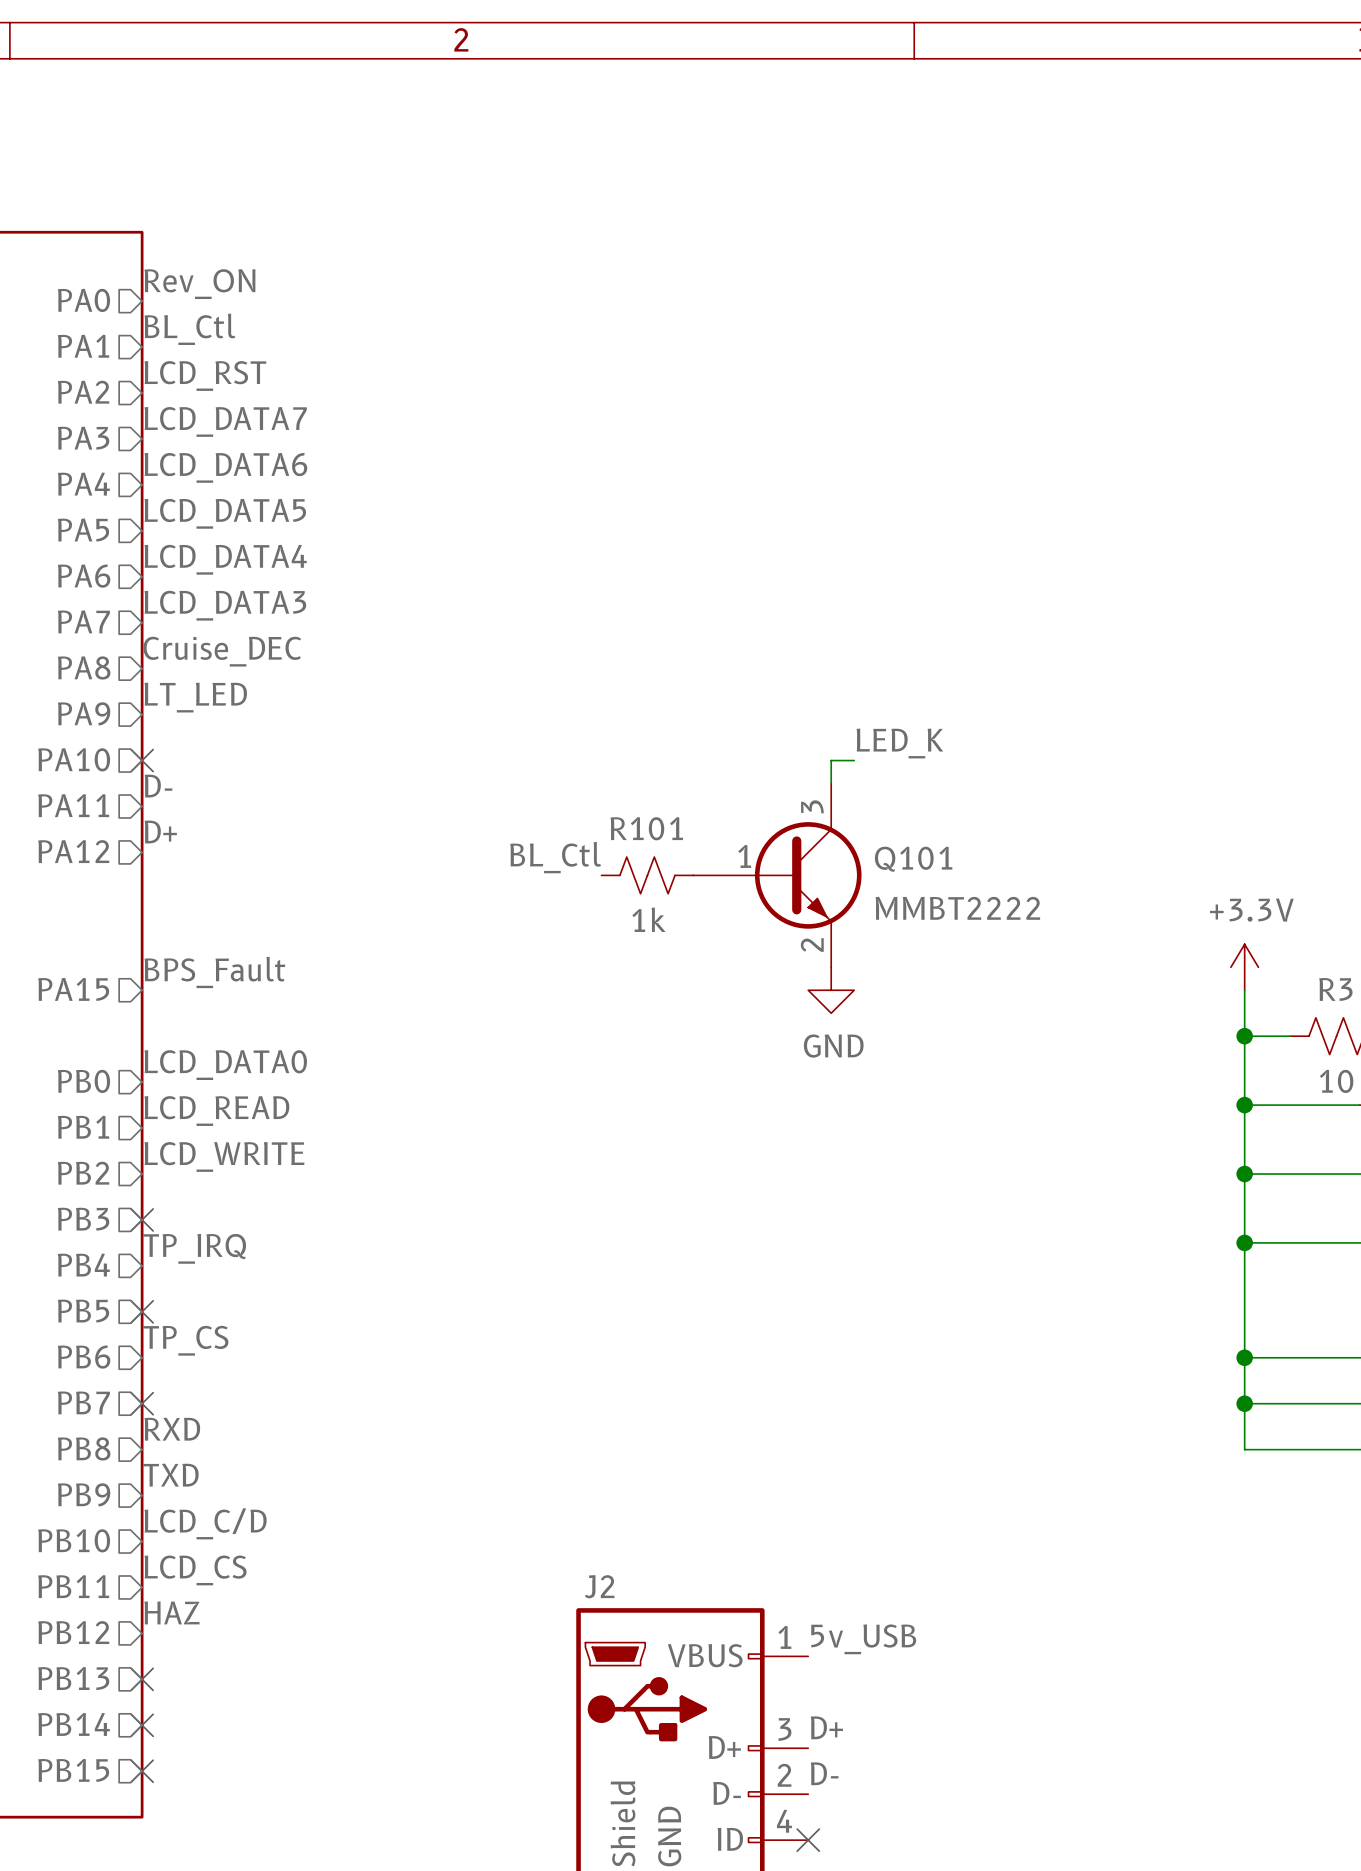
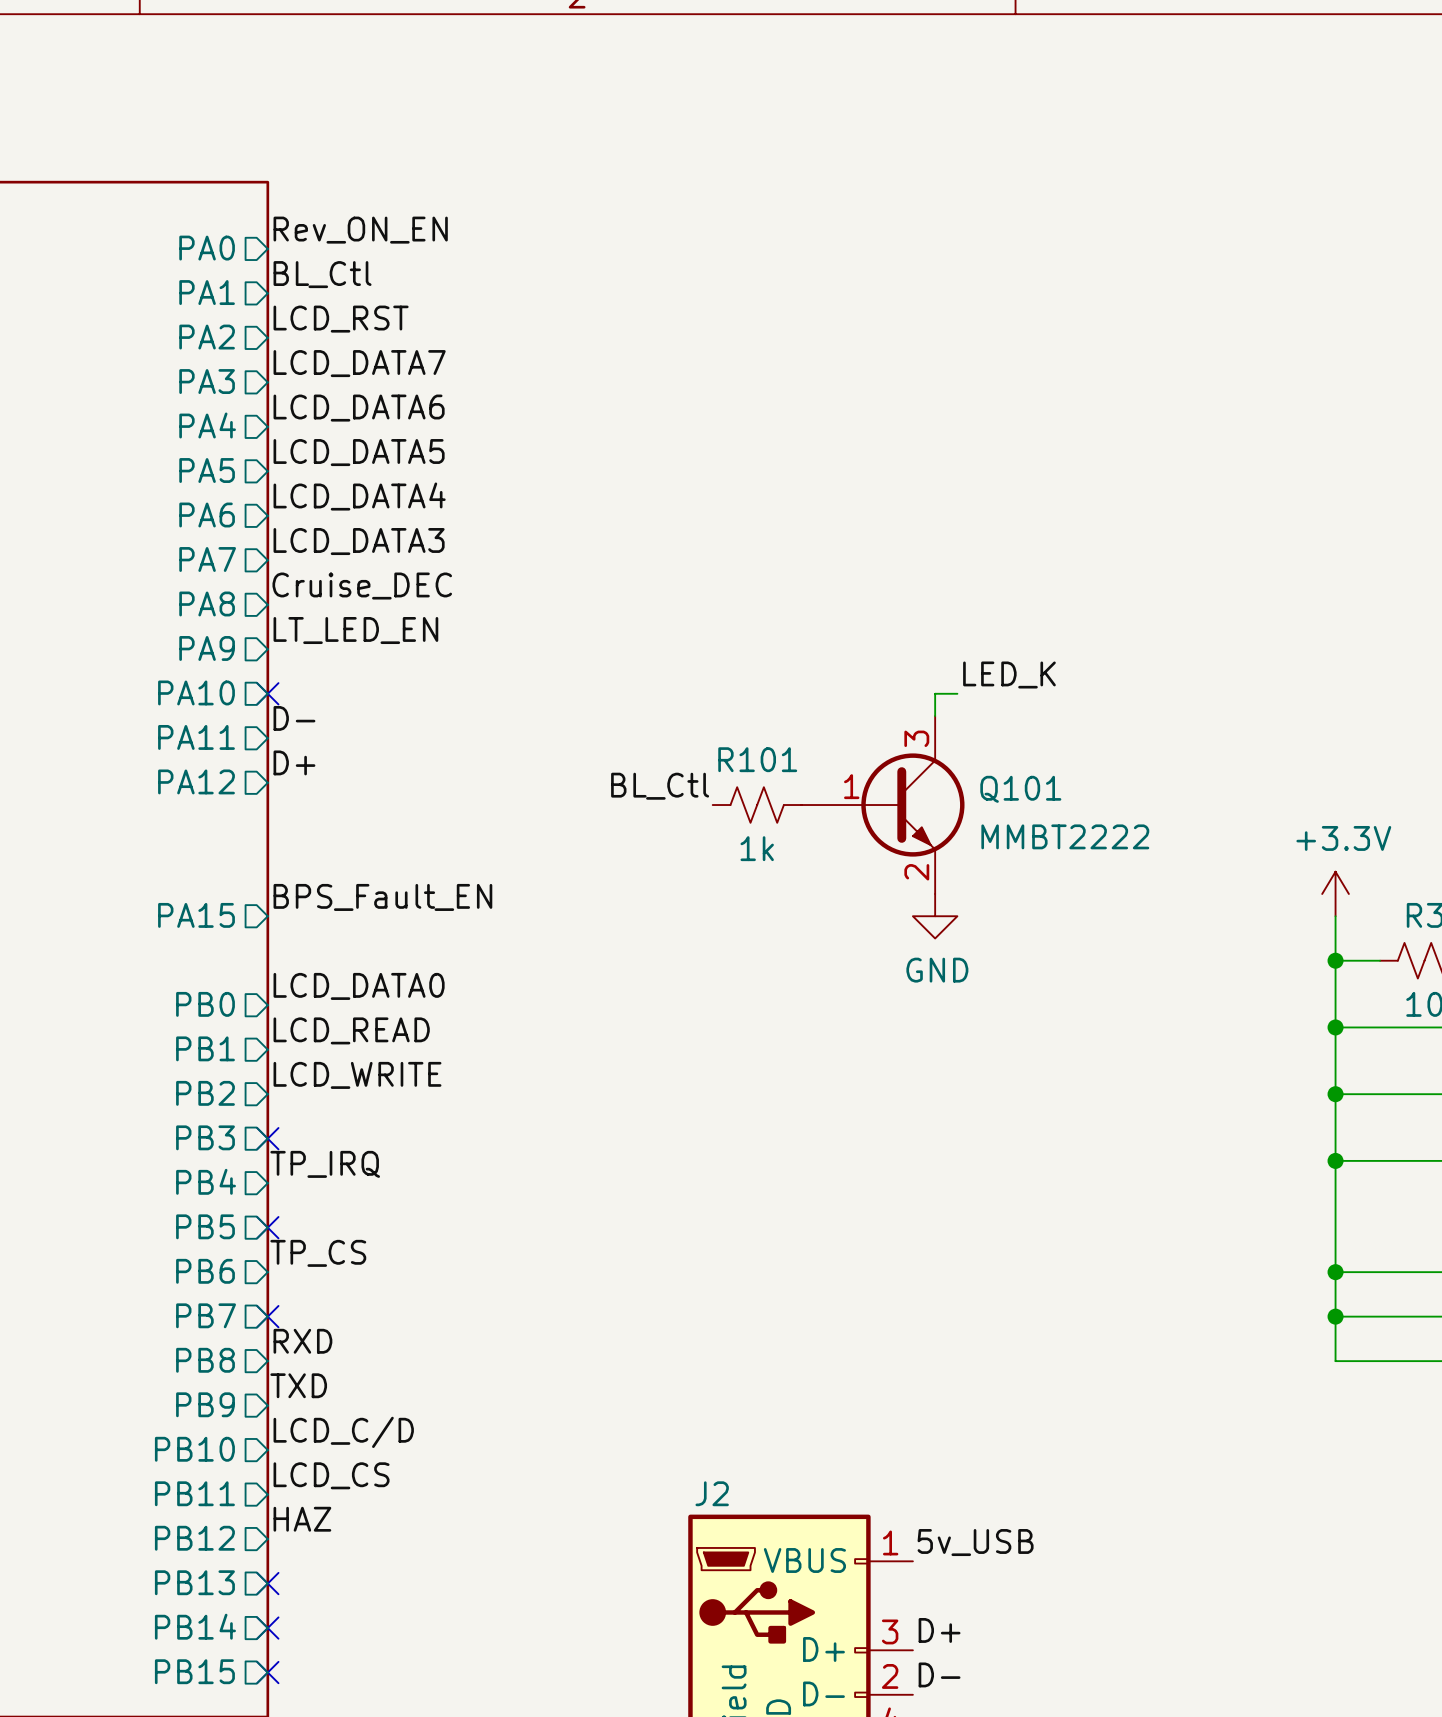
label: Rev_ON (199, 284) -> Rev_ON_EN (360, 230)
label: LT_LED (195, 697) -> LT_LED_EN (355, 630)
label: BPS_Fault (214, 972) -> BPS_Fault_EN (382, 897)

